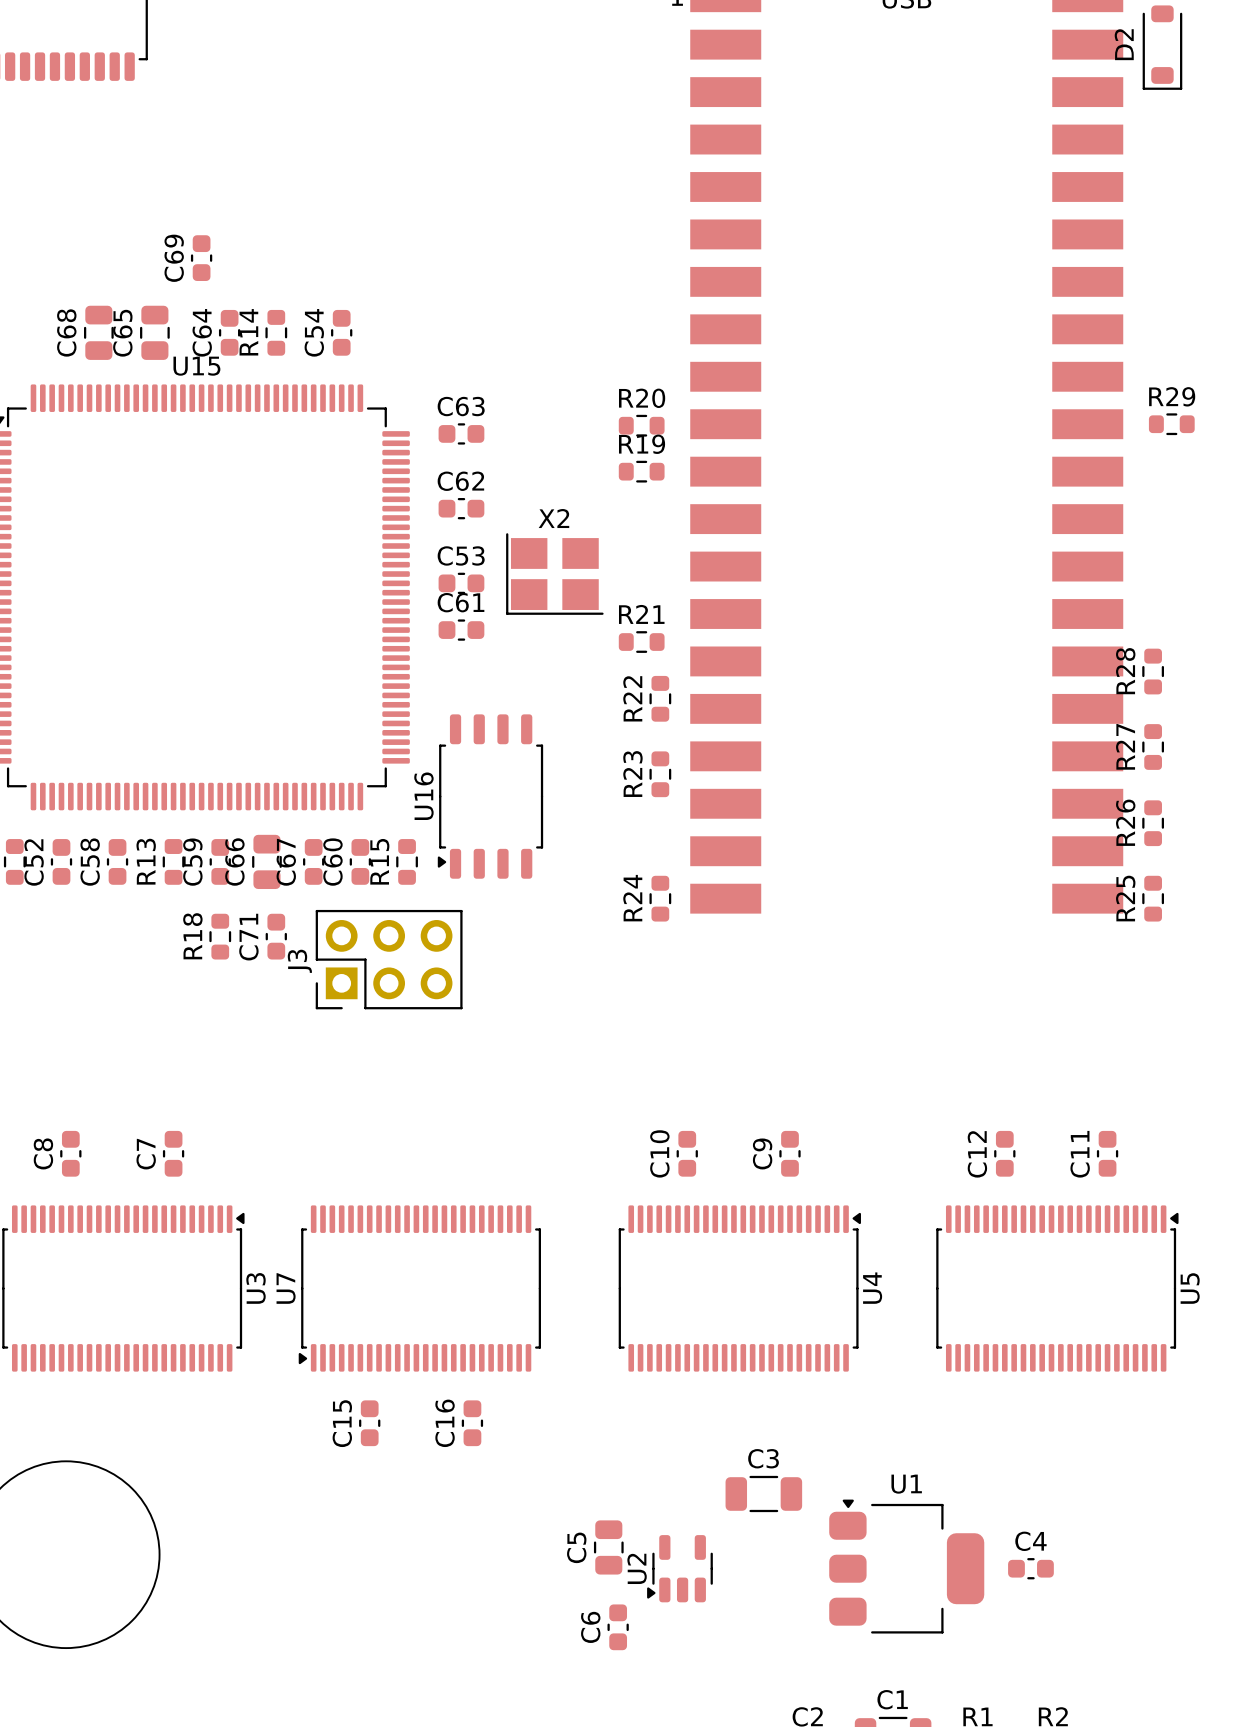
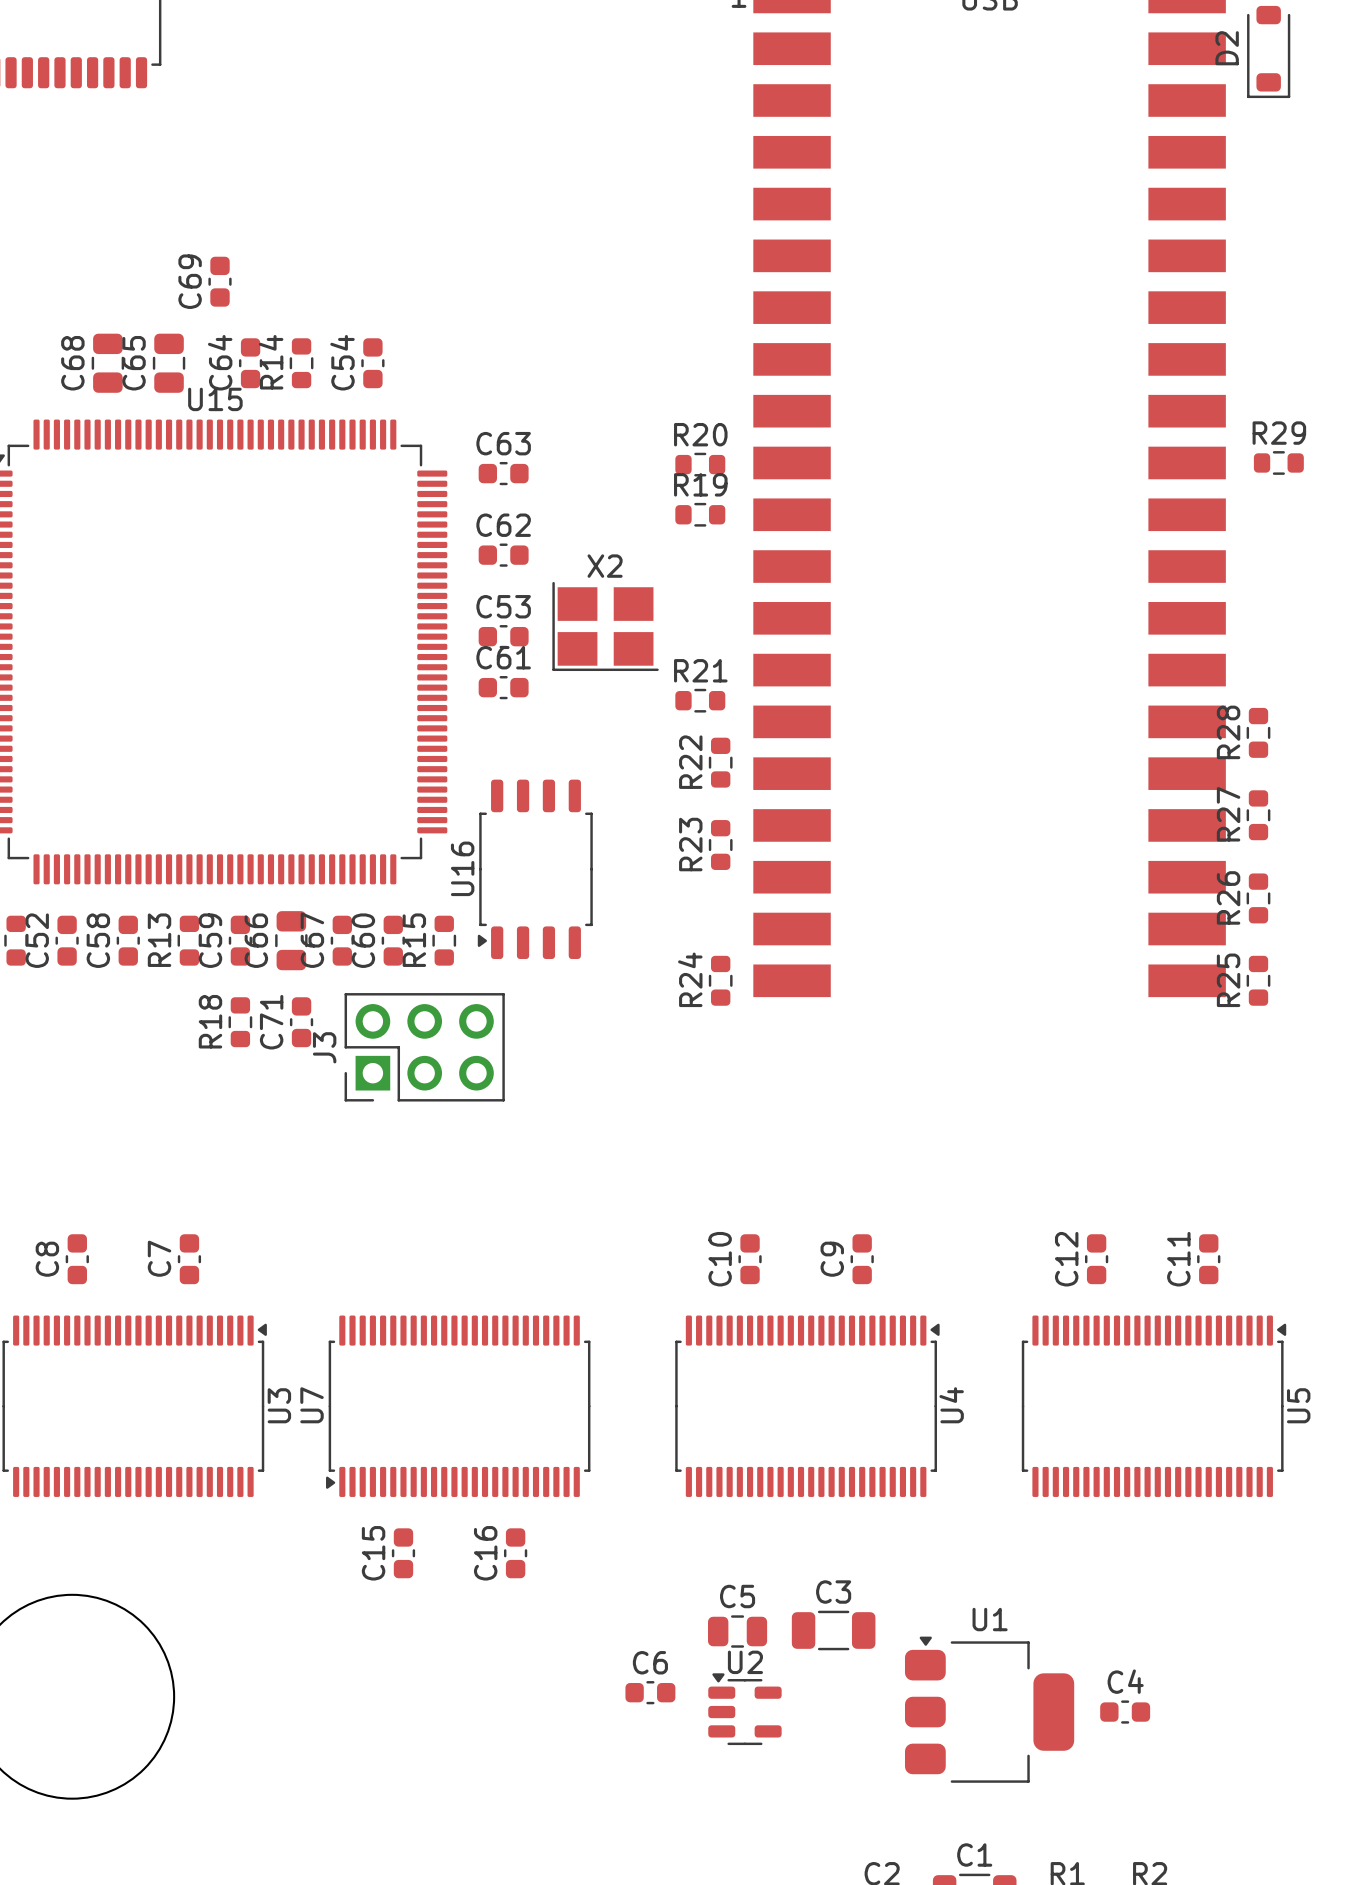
C5 rotation: 0° (608, 1547) -> 90° clockwise (737, 1631)
C5 position: (608, 1547) -> (737, 1631)
U2 rotation: 0° (679, 1568) -> 90° clockwise (744, 1709)
C6 rotation: 0° (618, 1627) -> 90° clockwise (650, 1692)
C6 position: (618, 1627) -> (650, 1692)

